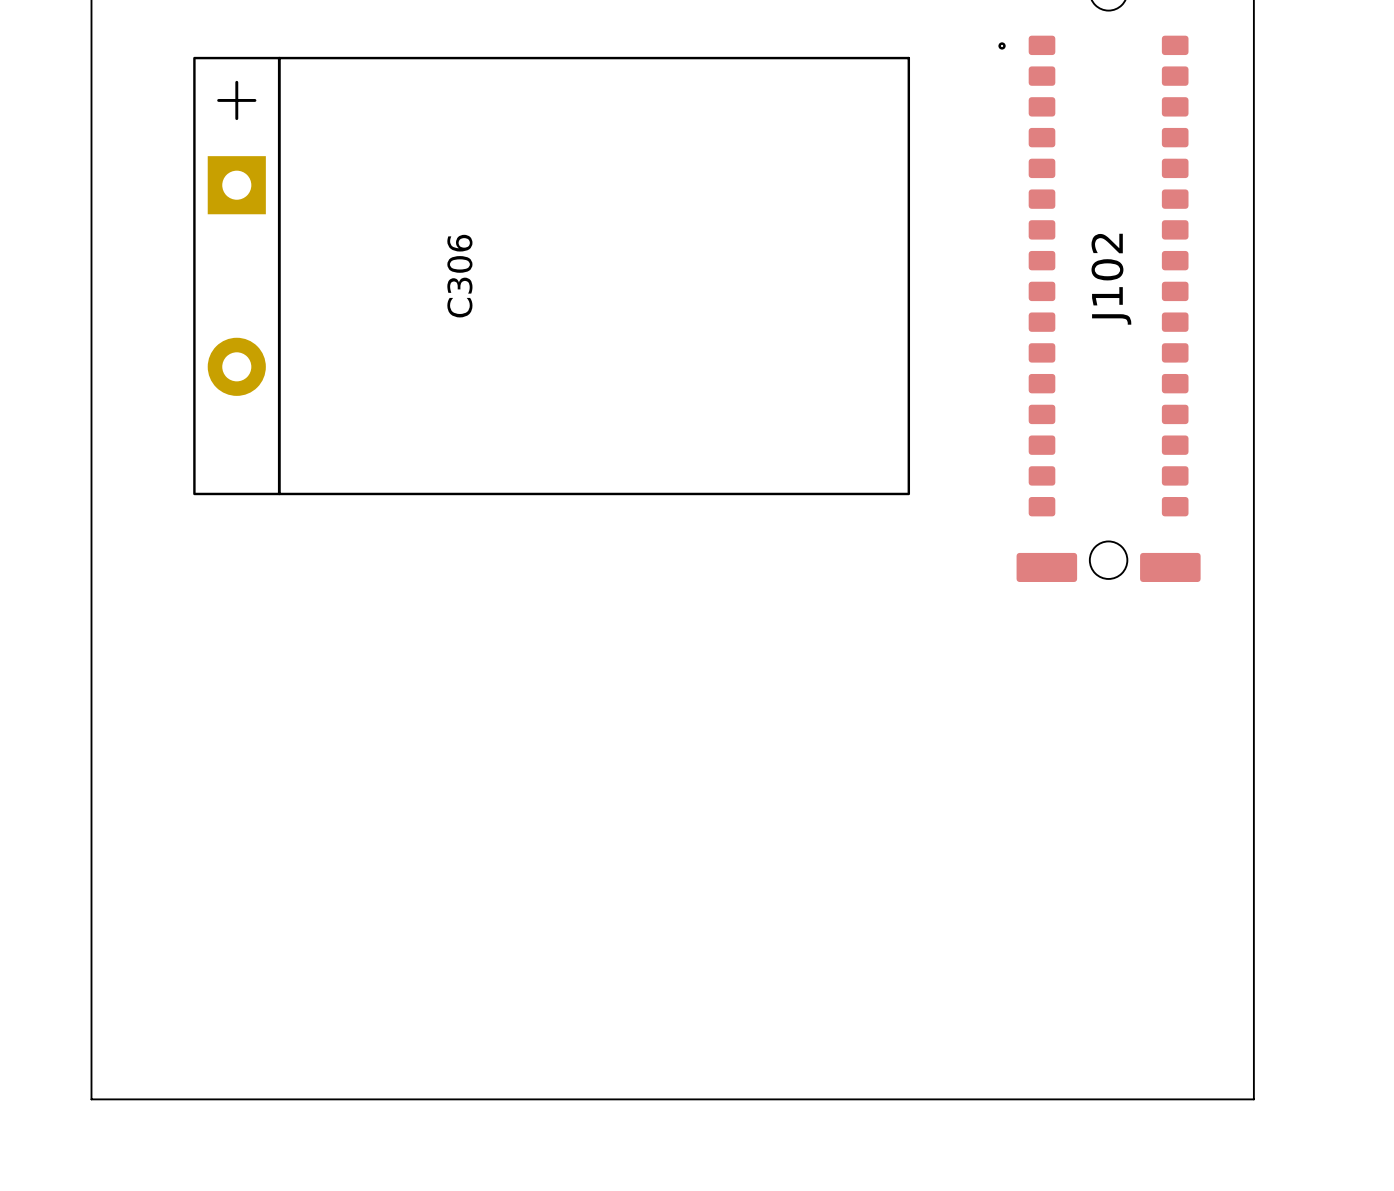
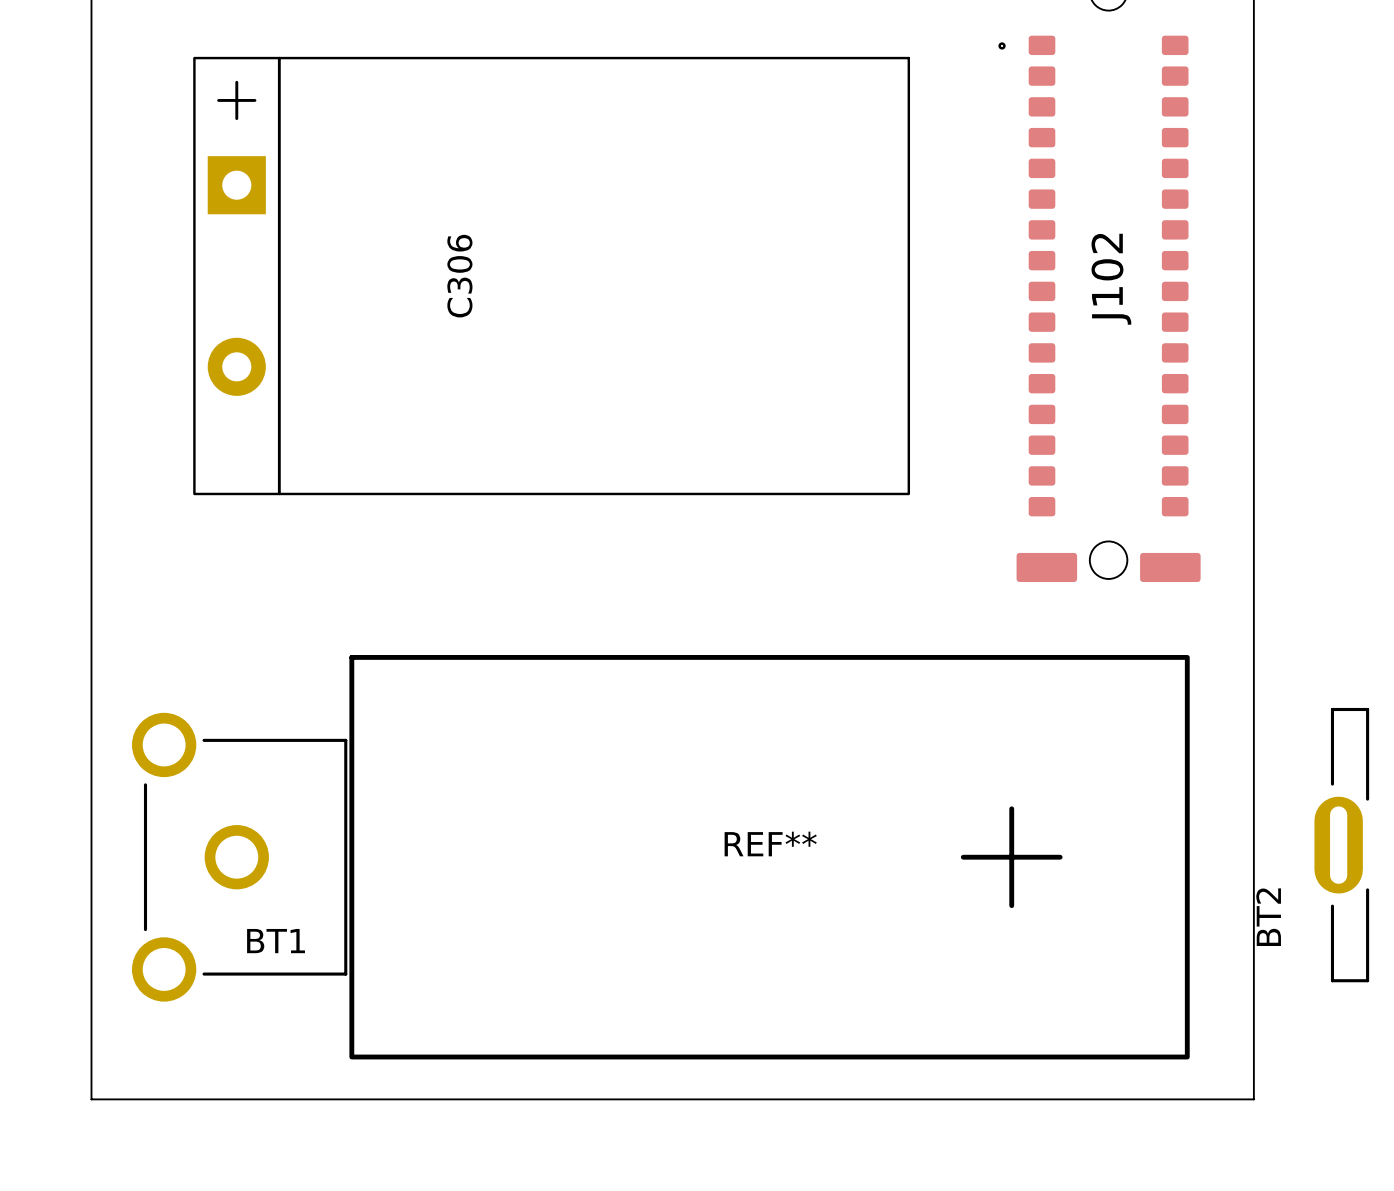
BT2: none -> (1341, 845)
BT1: none -> (239, 857)
REF**: none -> (769, 857)

